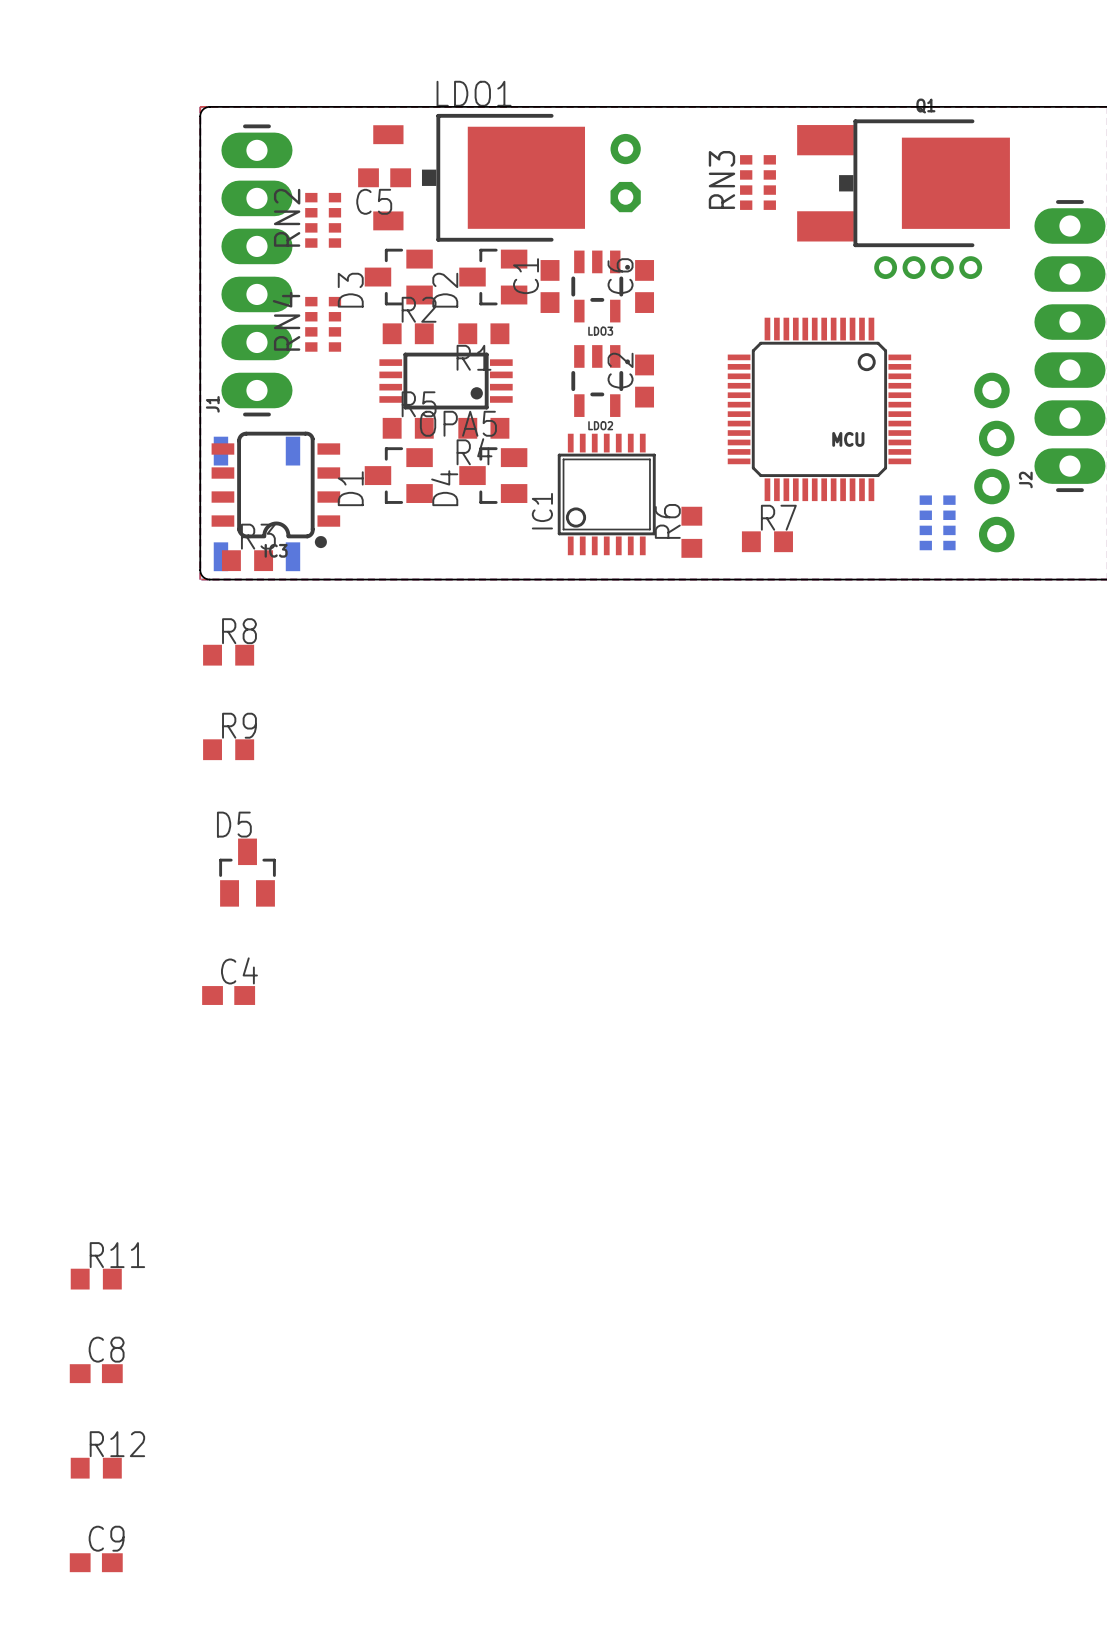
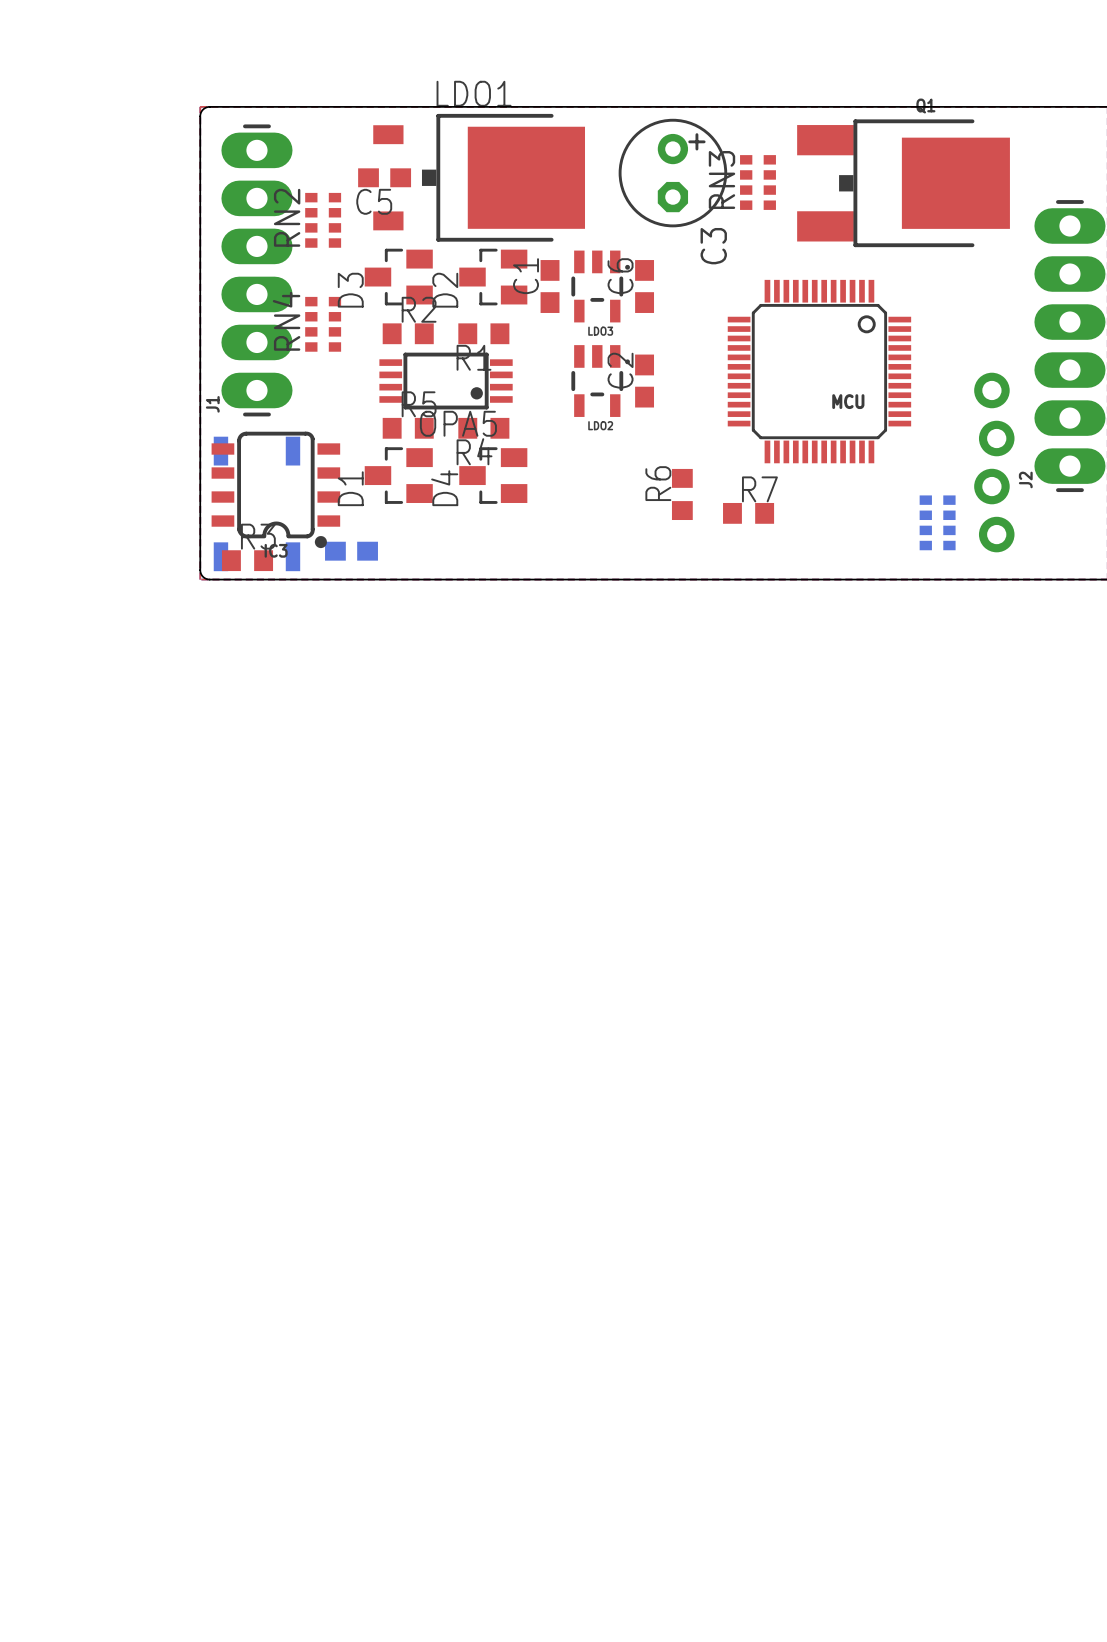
C3 side: bottom (625, 173) -> top (672, 173)
part: (928, 267) -> none
MCU position: (819, 409) -> (819, 371)
IC1: (606, 494) -> none
R6 position: (691, 532) -> (682, 494)
R7 position: (767, 541) -> (748, 513)
R8: (228, 655) -> none
R9: (228, 749) -> none
D5: (247, 872) -> none
C4 side: top (228, 995) -> bottom (351, 551)
R11: (96, 1279) -> none
C8: (96, 1373) -> none
R12: (96, 1468) -> none
C9: (96, 1562) -> none

